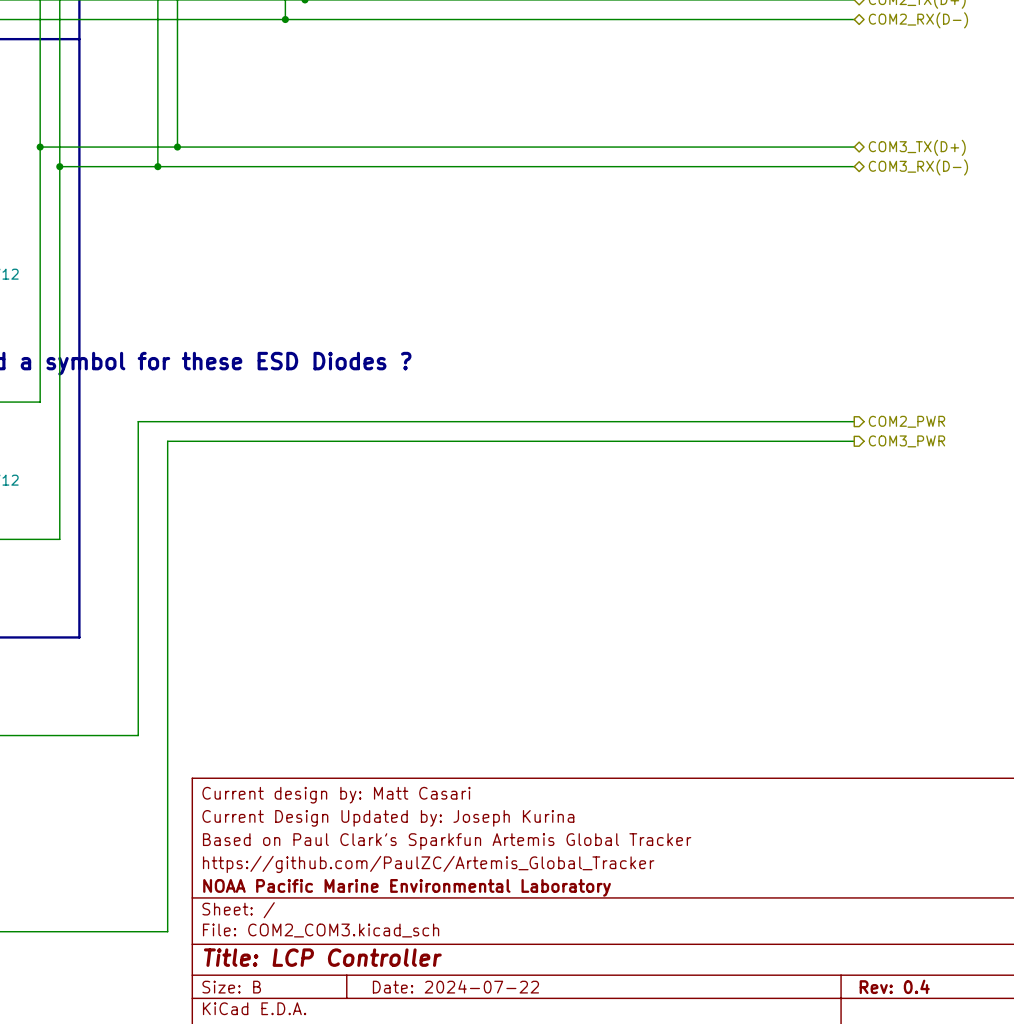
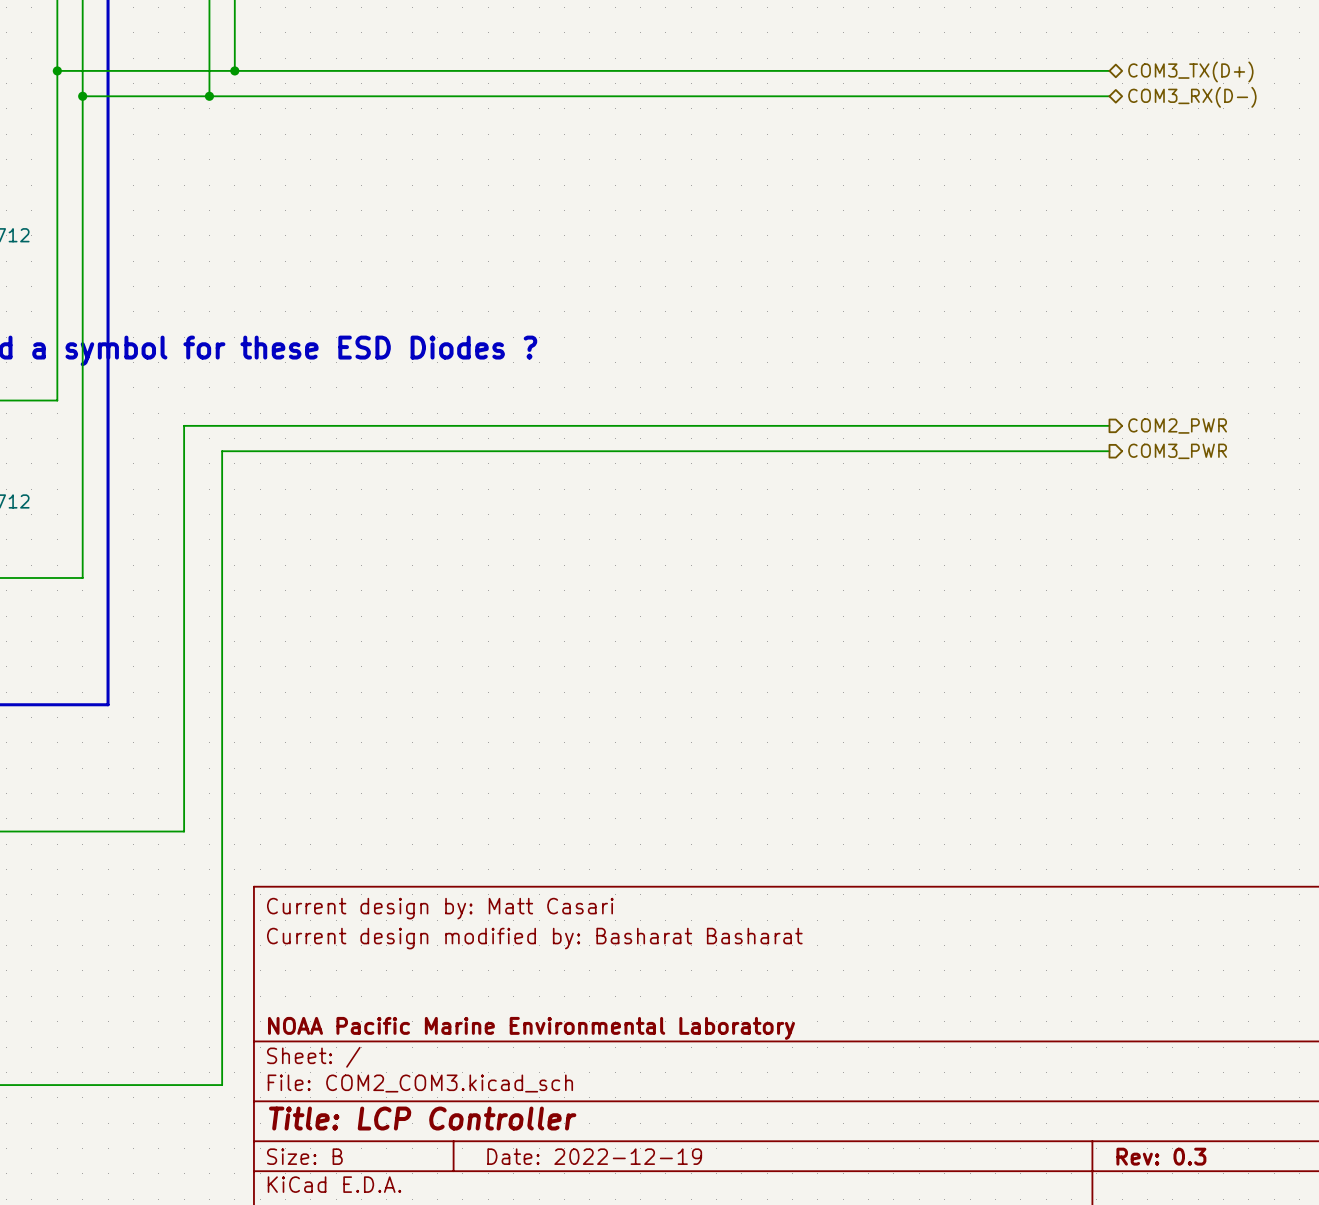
title block: Current Design Updated by: Joseph Kurina (388, 818) -> Current design modified by: Basharat Basharat (534, 938)
title block: Based on Paul Clark's Sparkfun Artemis Global Tracker (447, 841) -> none
title block: https://github.com/PaulZC/Artemis_Global_Tracker (428, 864) -> none
title block: Date: 2024-07-22 (455, 986) -> Date: 2022-12-19 (594, 1156)
title block: Rev: 0.4 (894, 986) -> Rev: 0.3 (1161, 1156)

